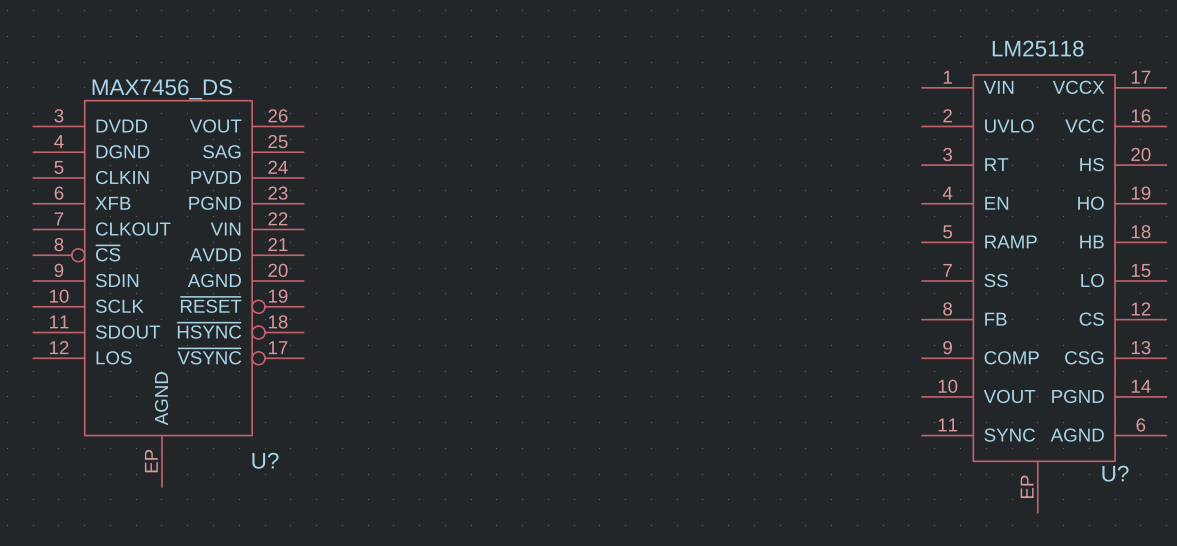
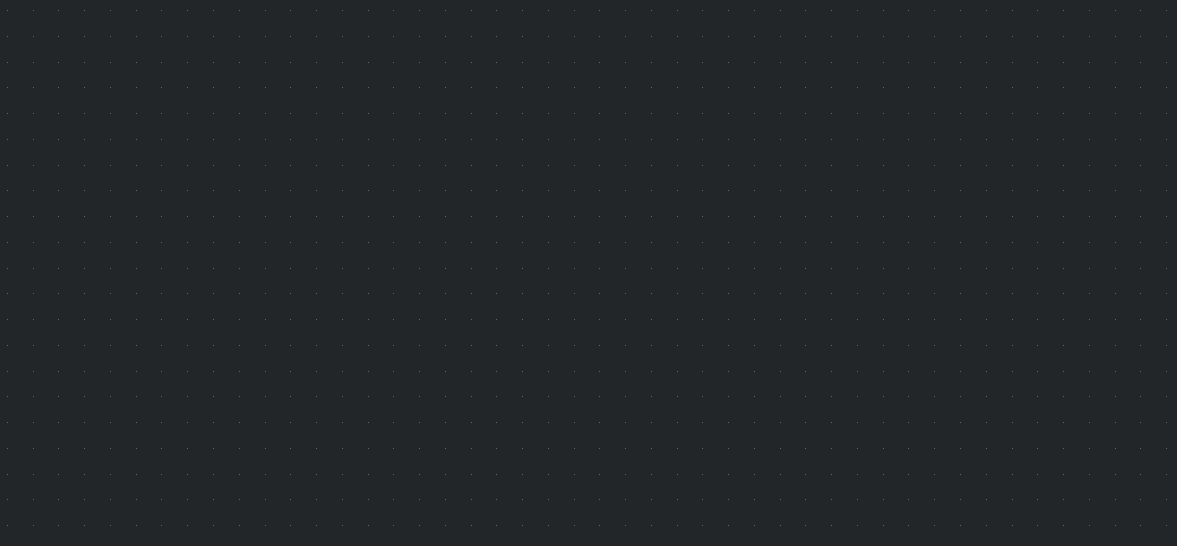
U?: MAX7456_DS (168, 293) -> none
U?: LM25118 (1044, 293) -> none

